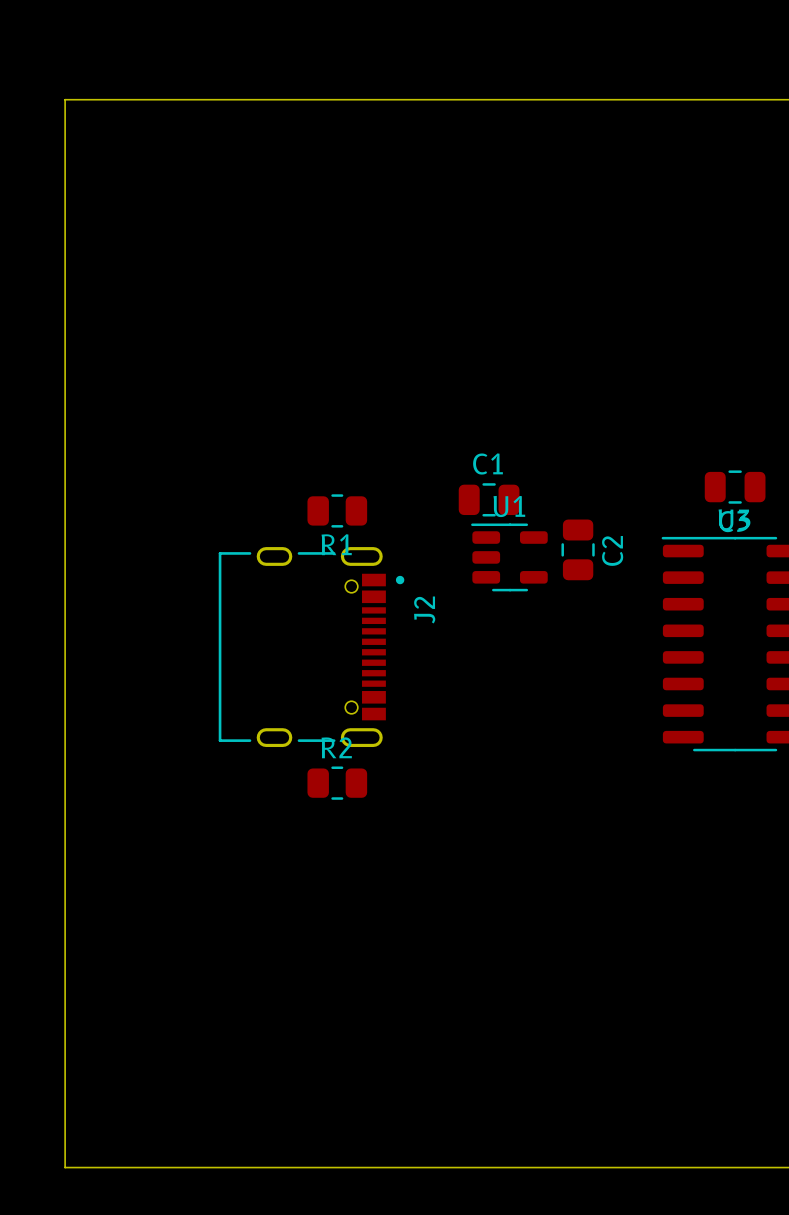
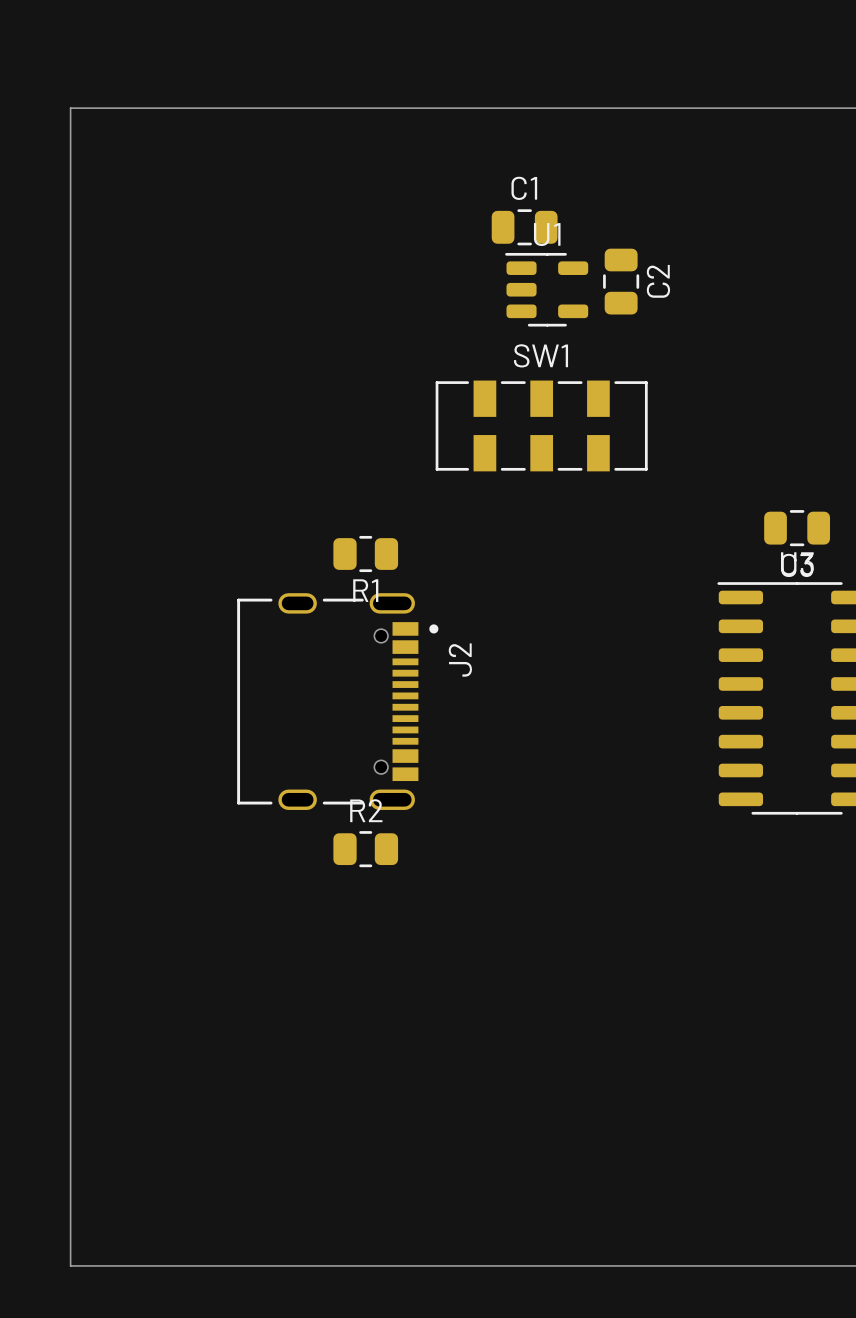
SW1: none -> (541, 425)
C1 position: (489, 499) -> (524, 227)
C2 position: (578, 549) -> (621, 281)
U1 position: (509, 557) -> (546, 289)

